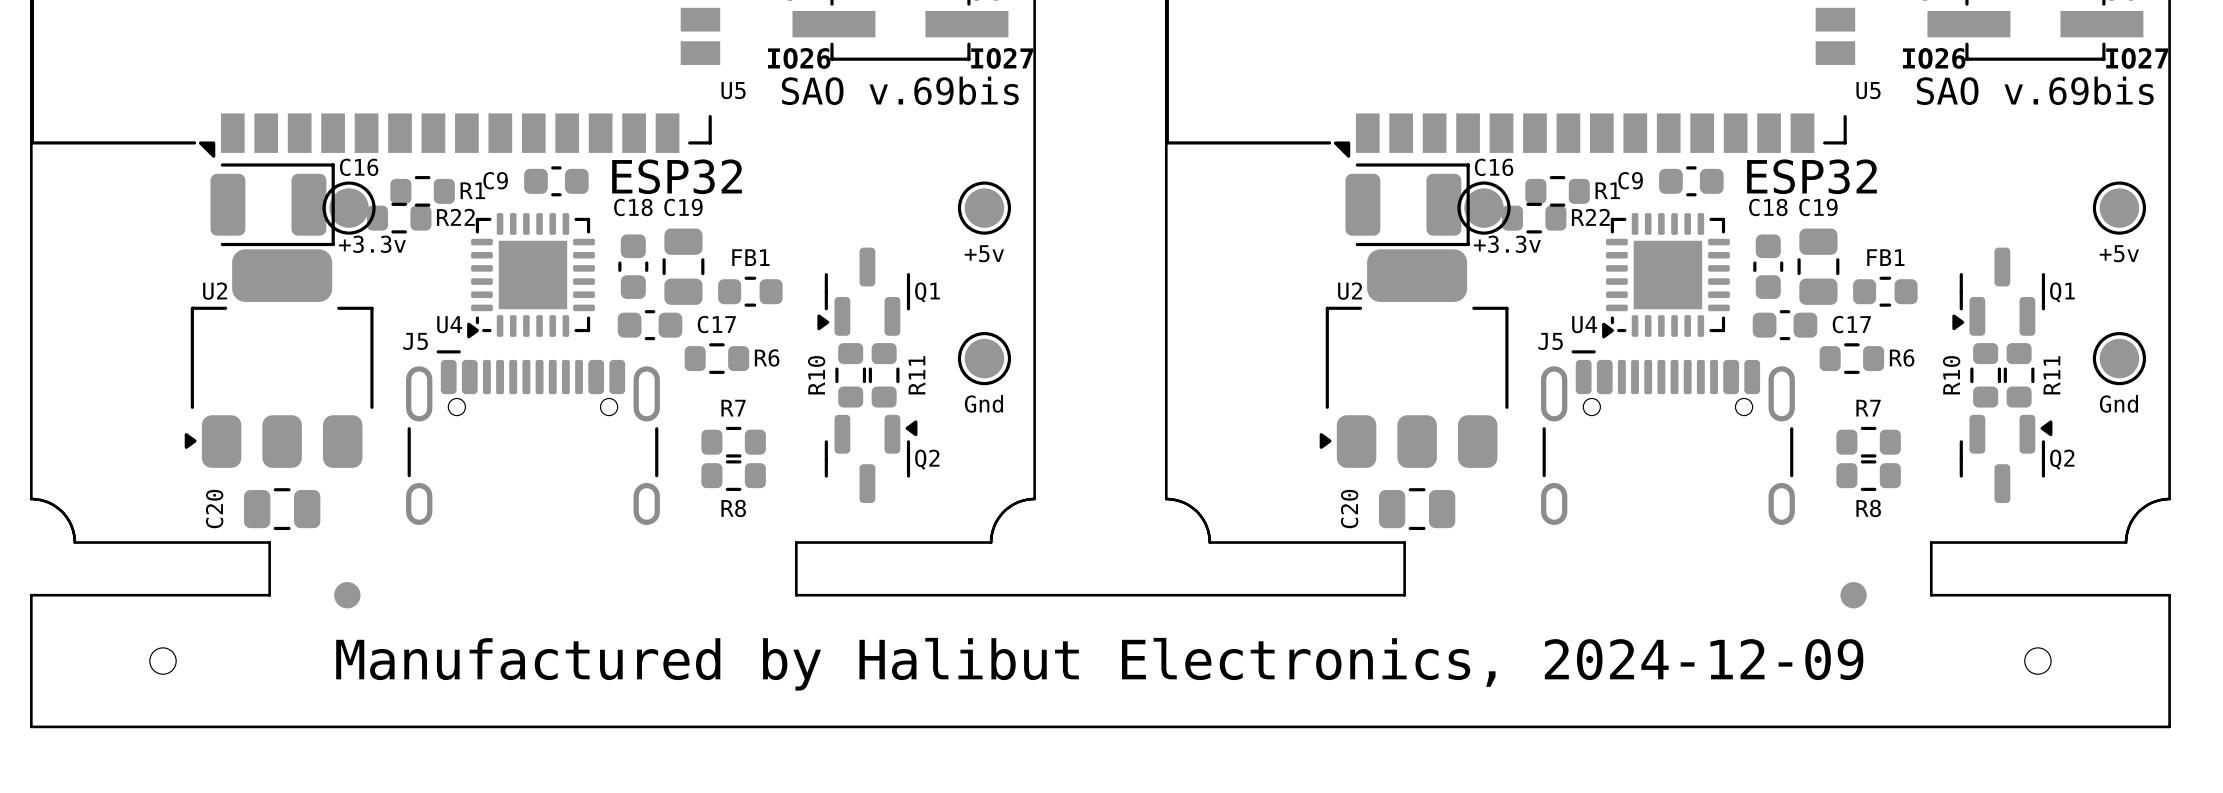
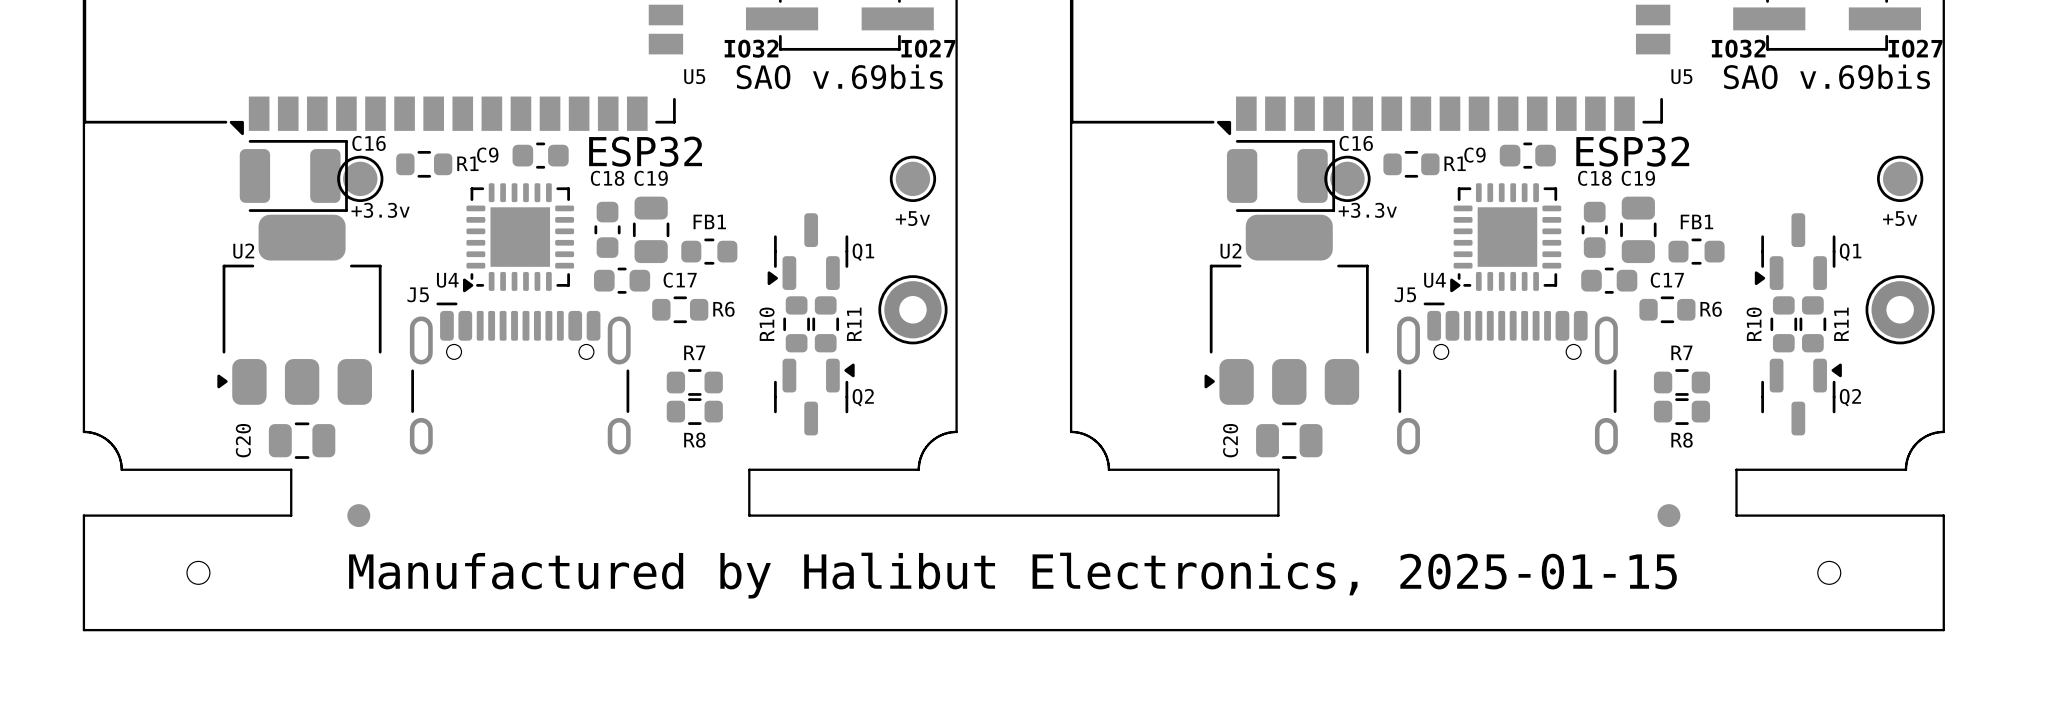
text: IO26 (799, 58) -> IO32 (751, 48)
text: IO26 (1934, 58) -> IO32 (1738, 48)
R22: (399, 218) -> none
R22: (1534, 218) -> none
part footprint: [957, 331, 1012, 386] -> [878, 275, 948, 345]
part footprint: [2092, 331, 2147, 386] -> [1865, 275, 1935, 345]
part value: Gnd (983, 403) -> none
part value: Gnd (2118, 403) -> none
text: Manufactured by Halibut Electronics, 2024-12-09 (1099, 664) -> Manufactured by Halibut Electronics, 2025-01-15 (1012, 575)

